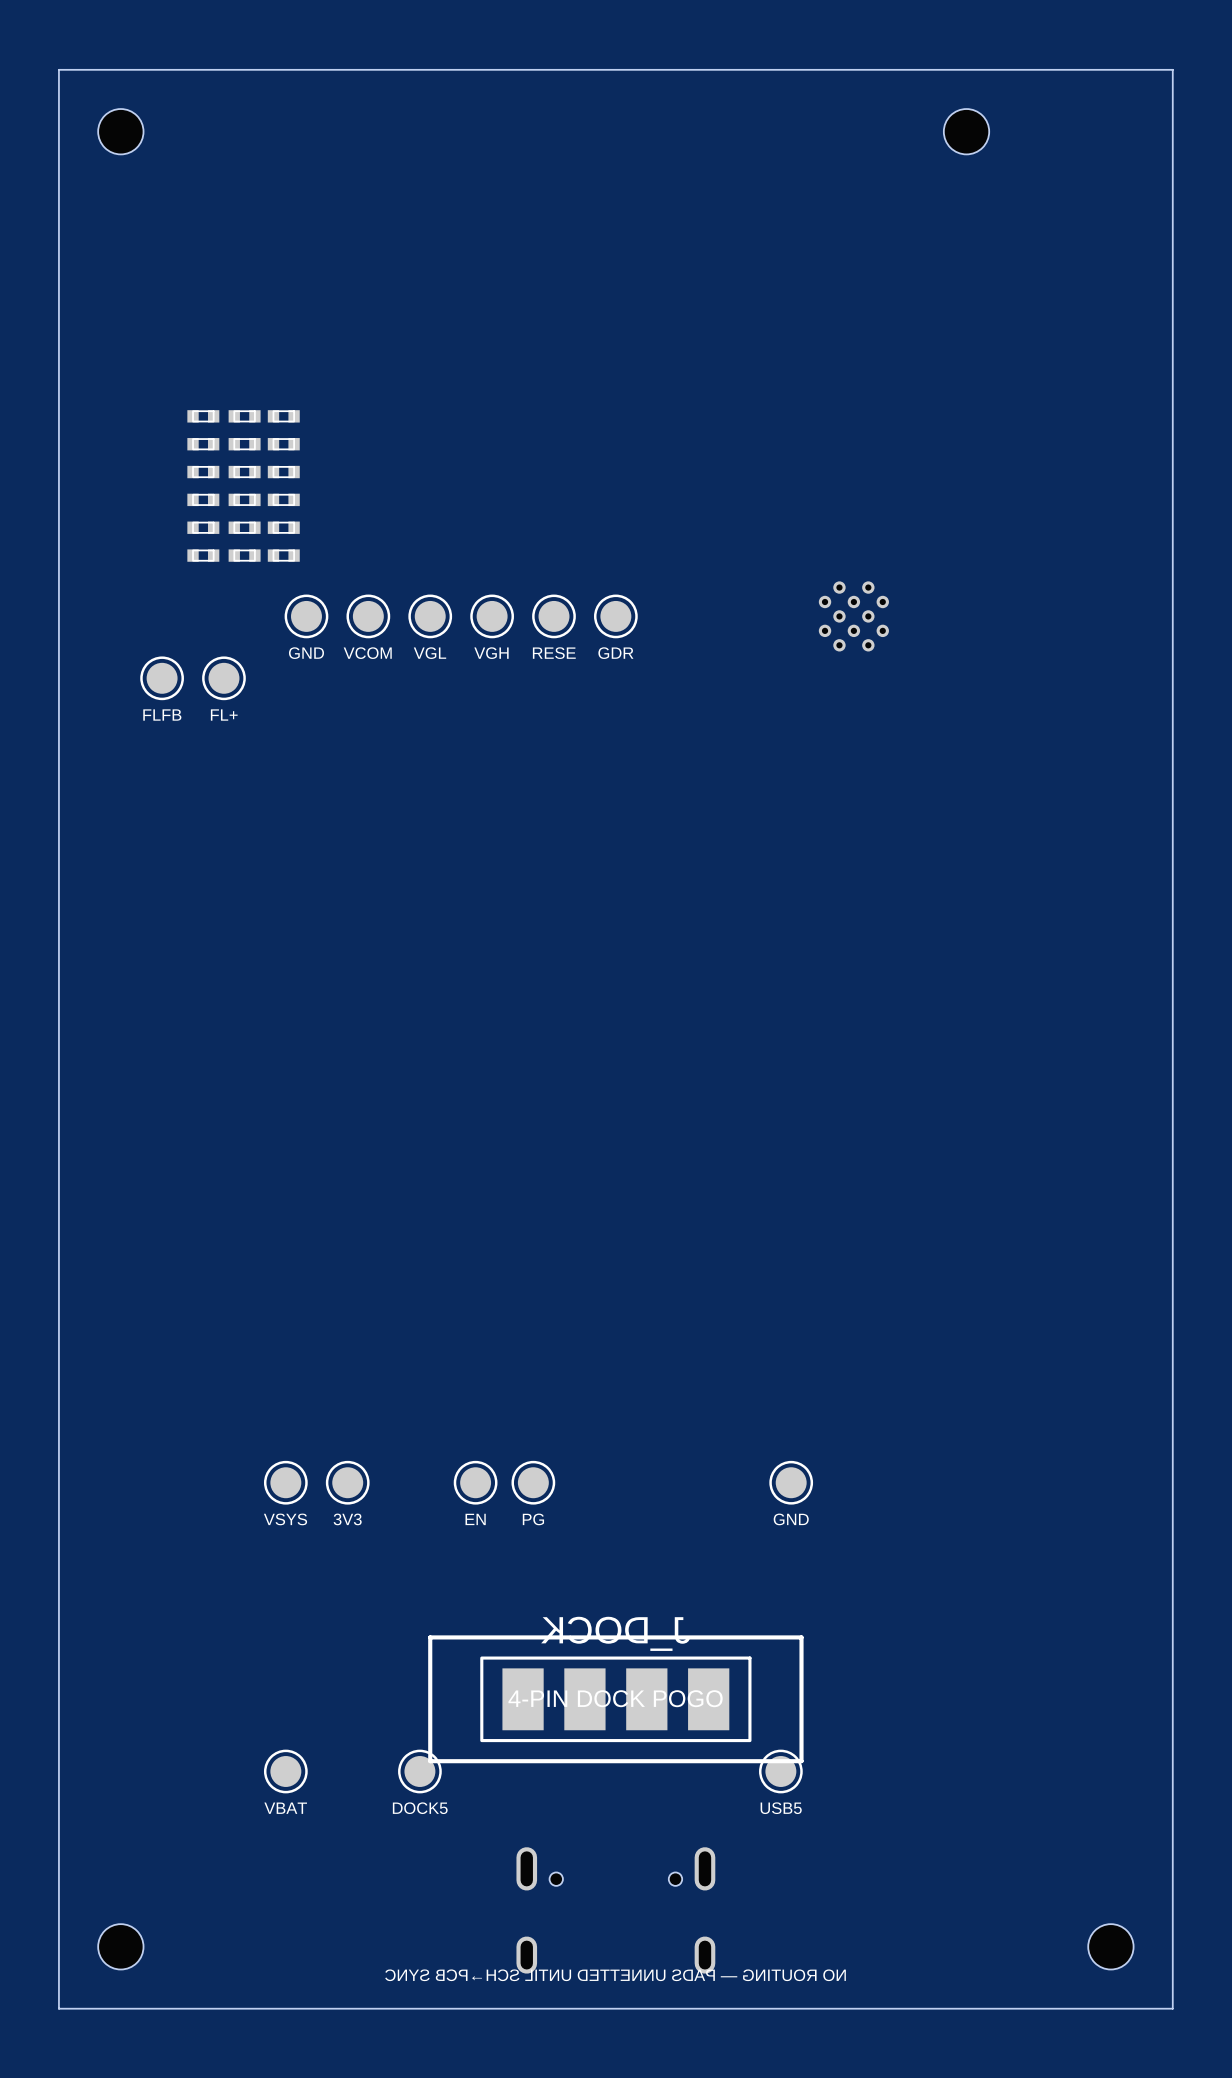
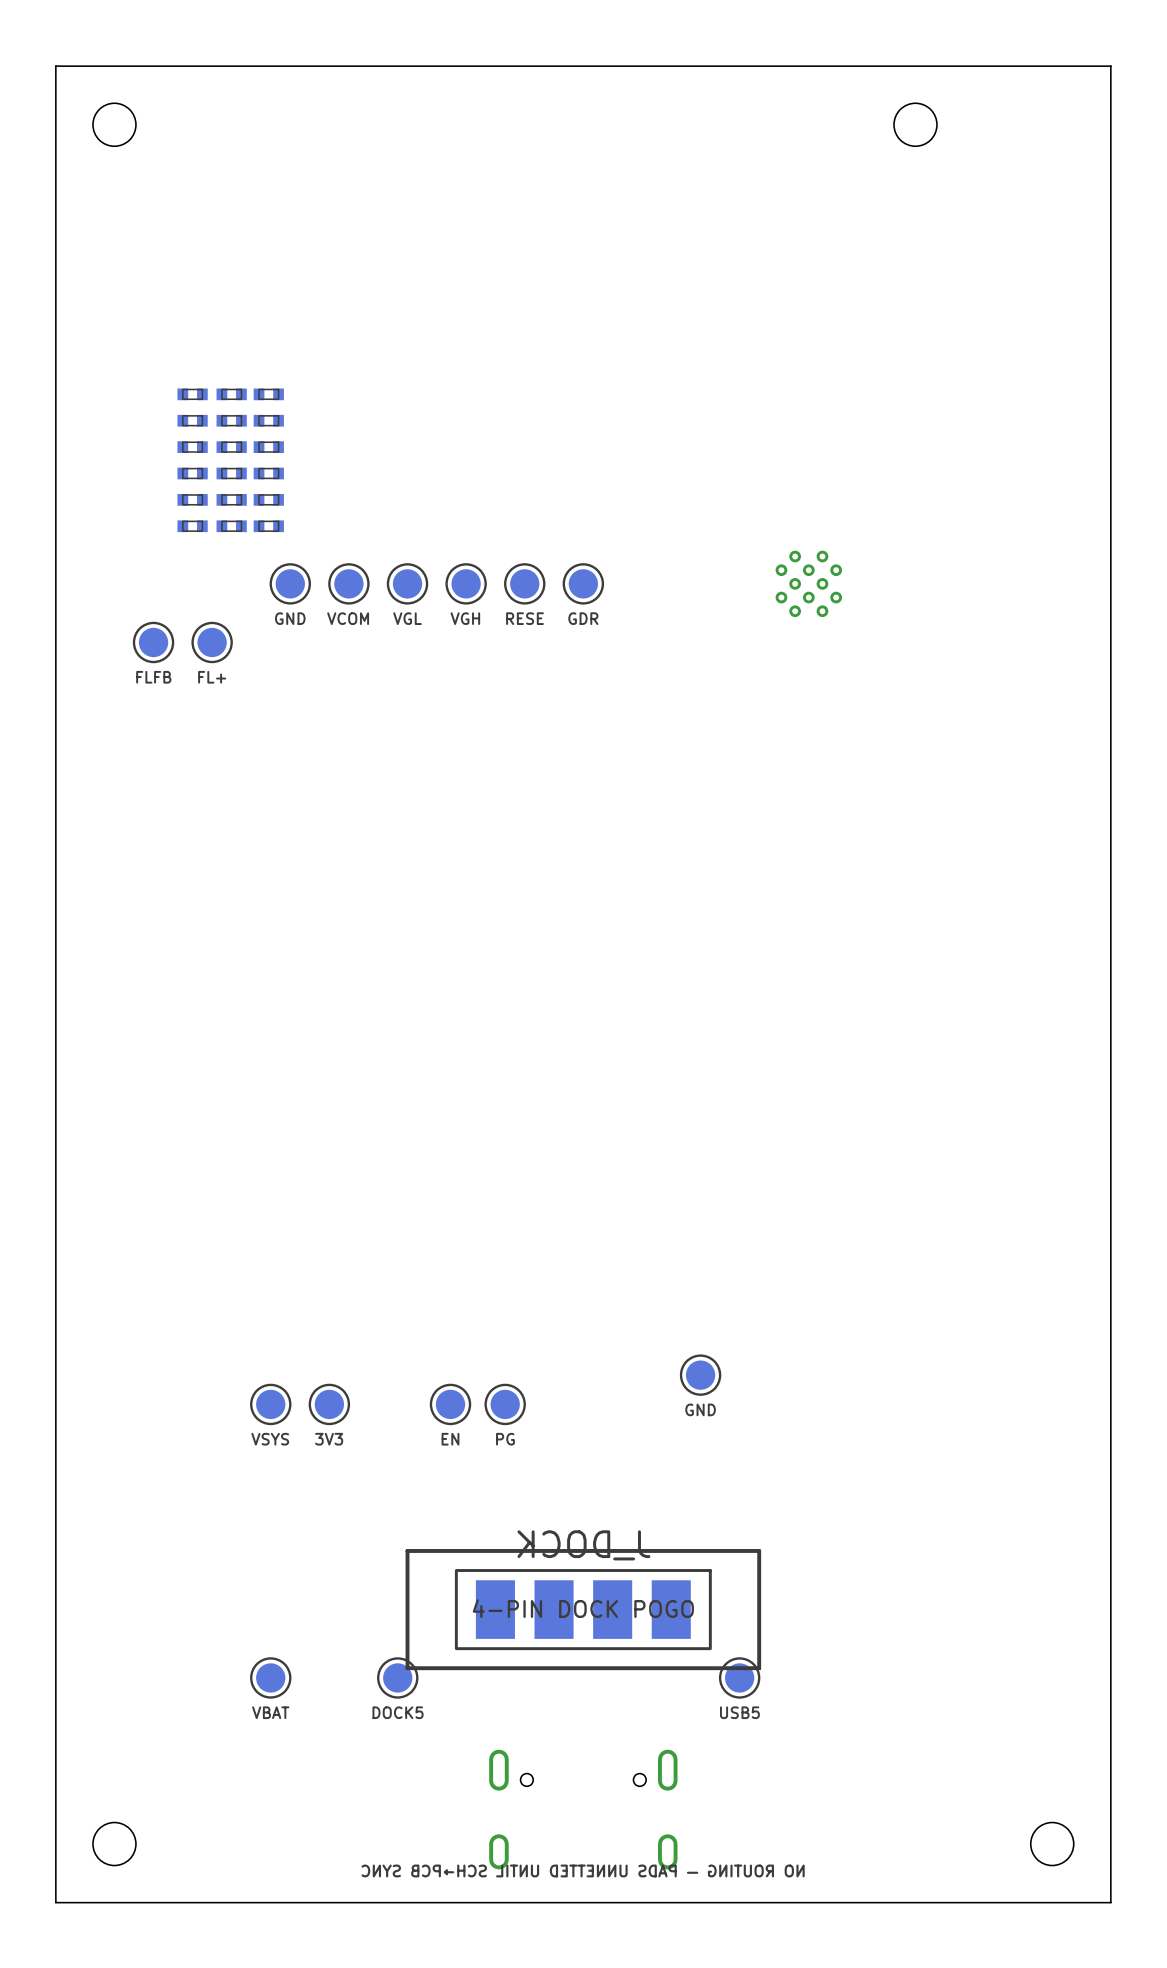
part position: (791, 1482) -> (700, 1375)

